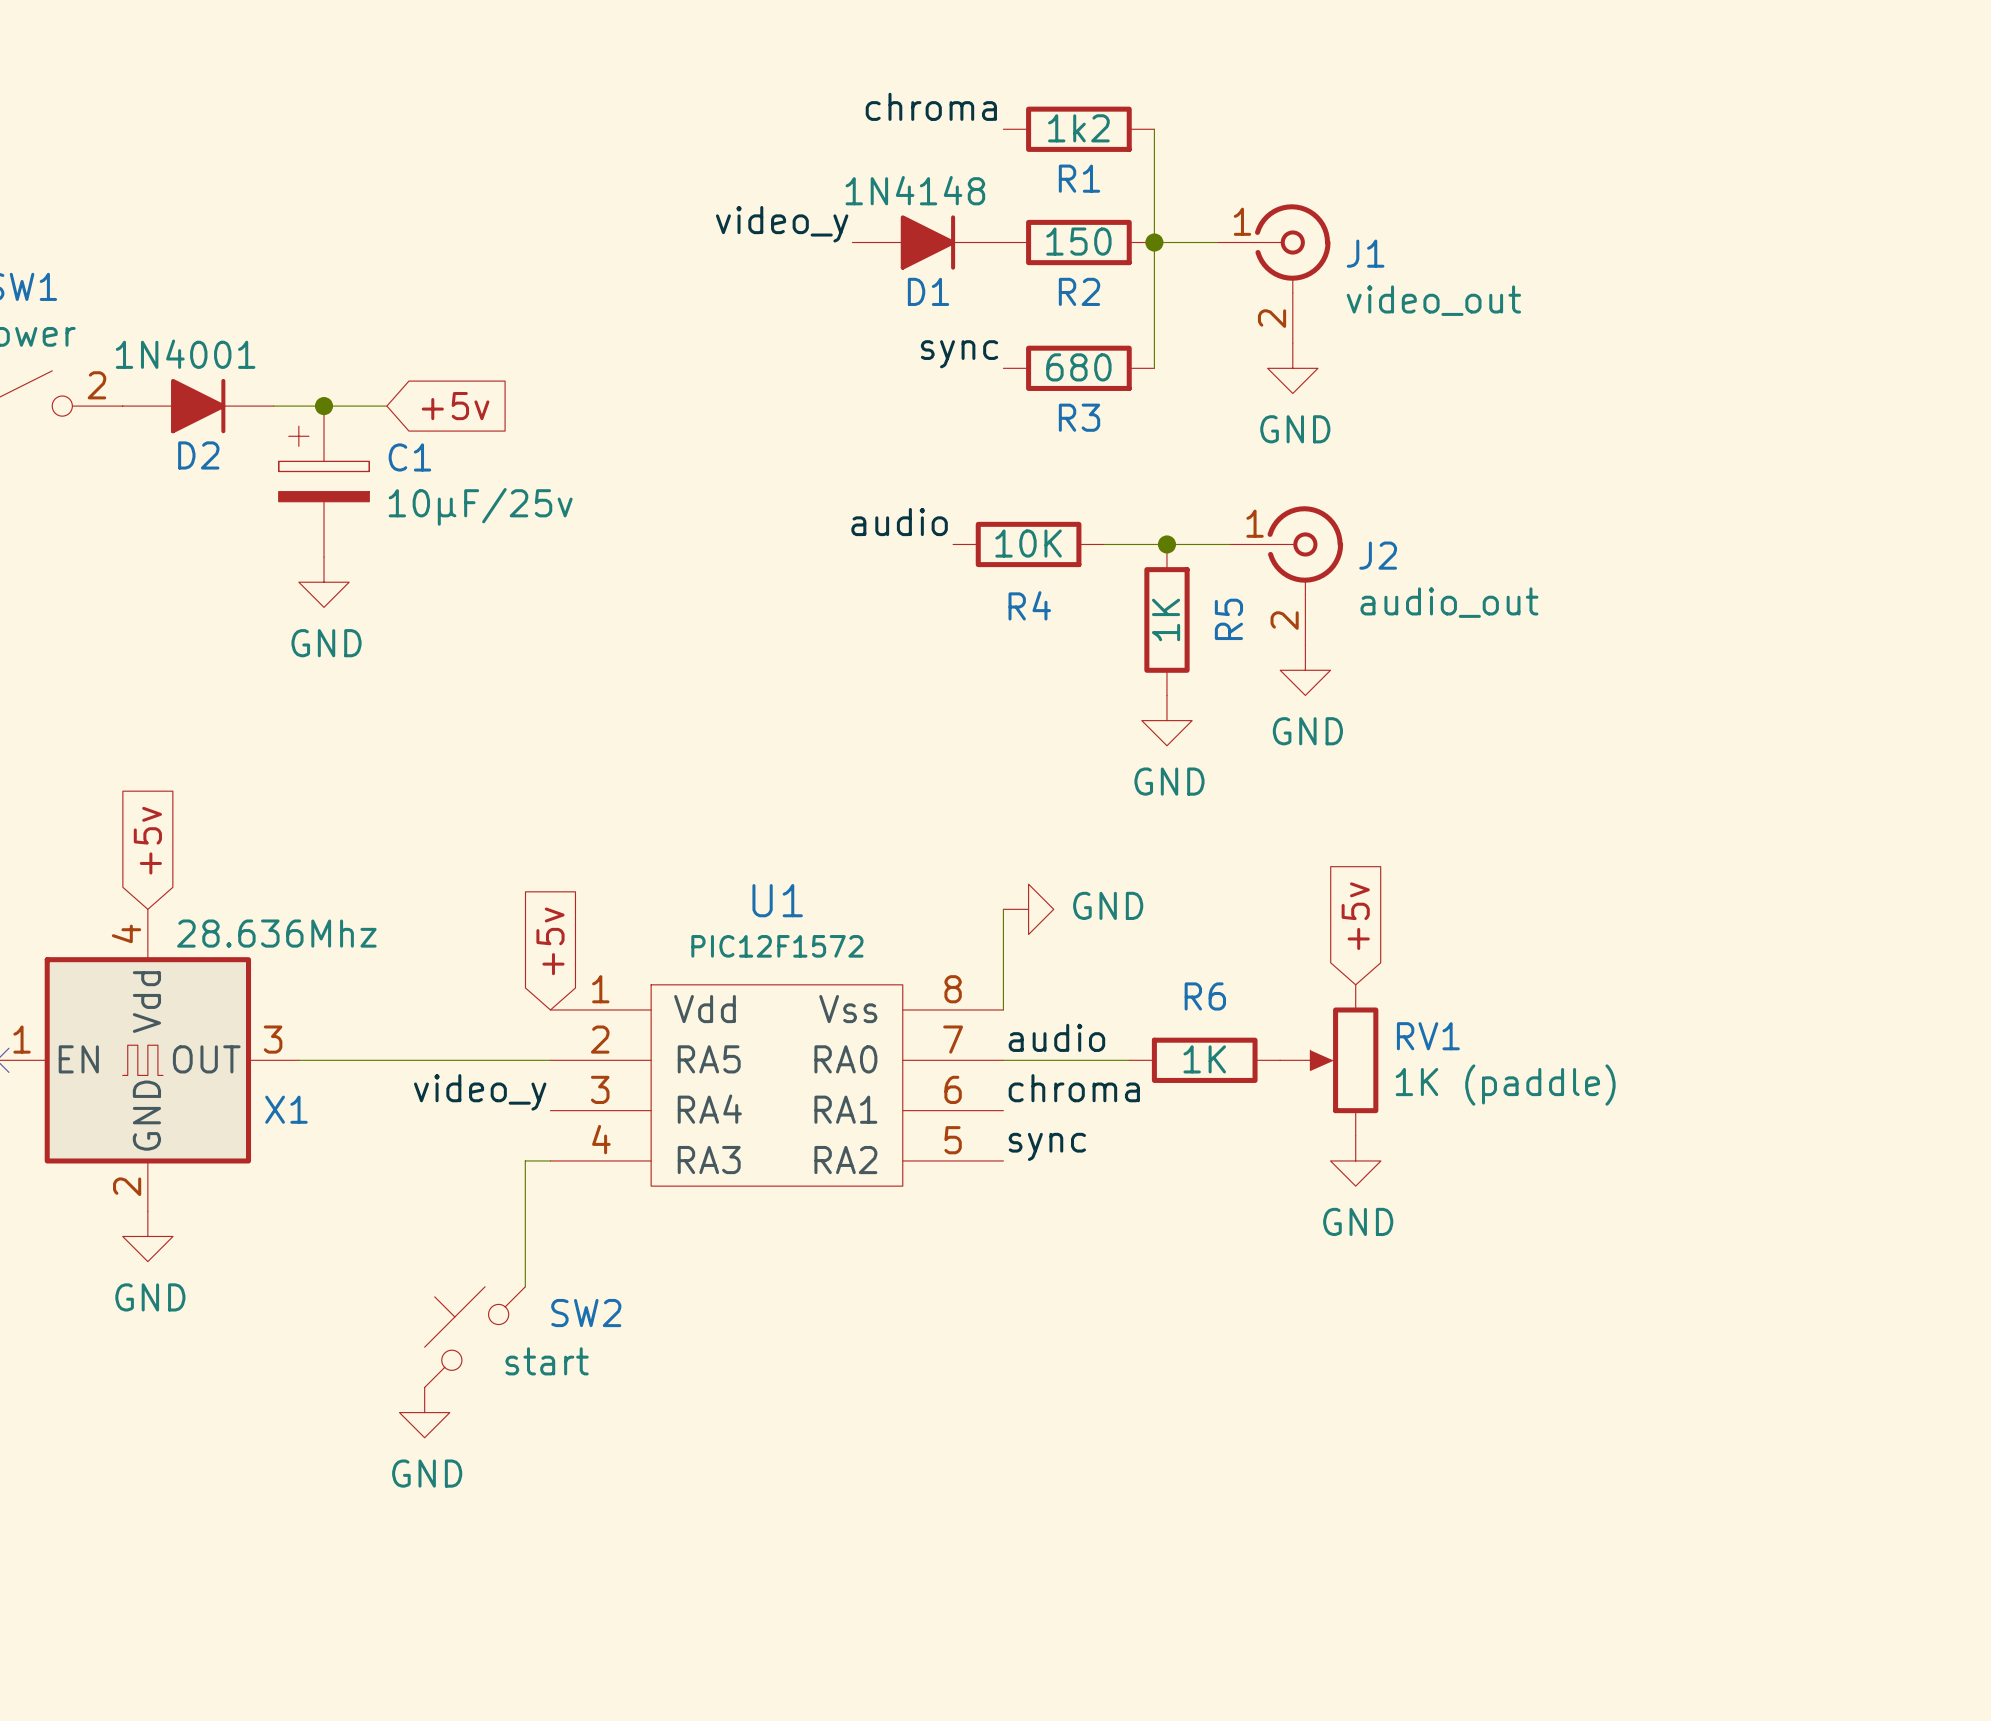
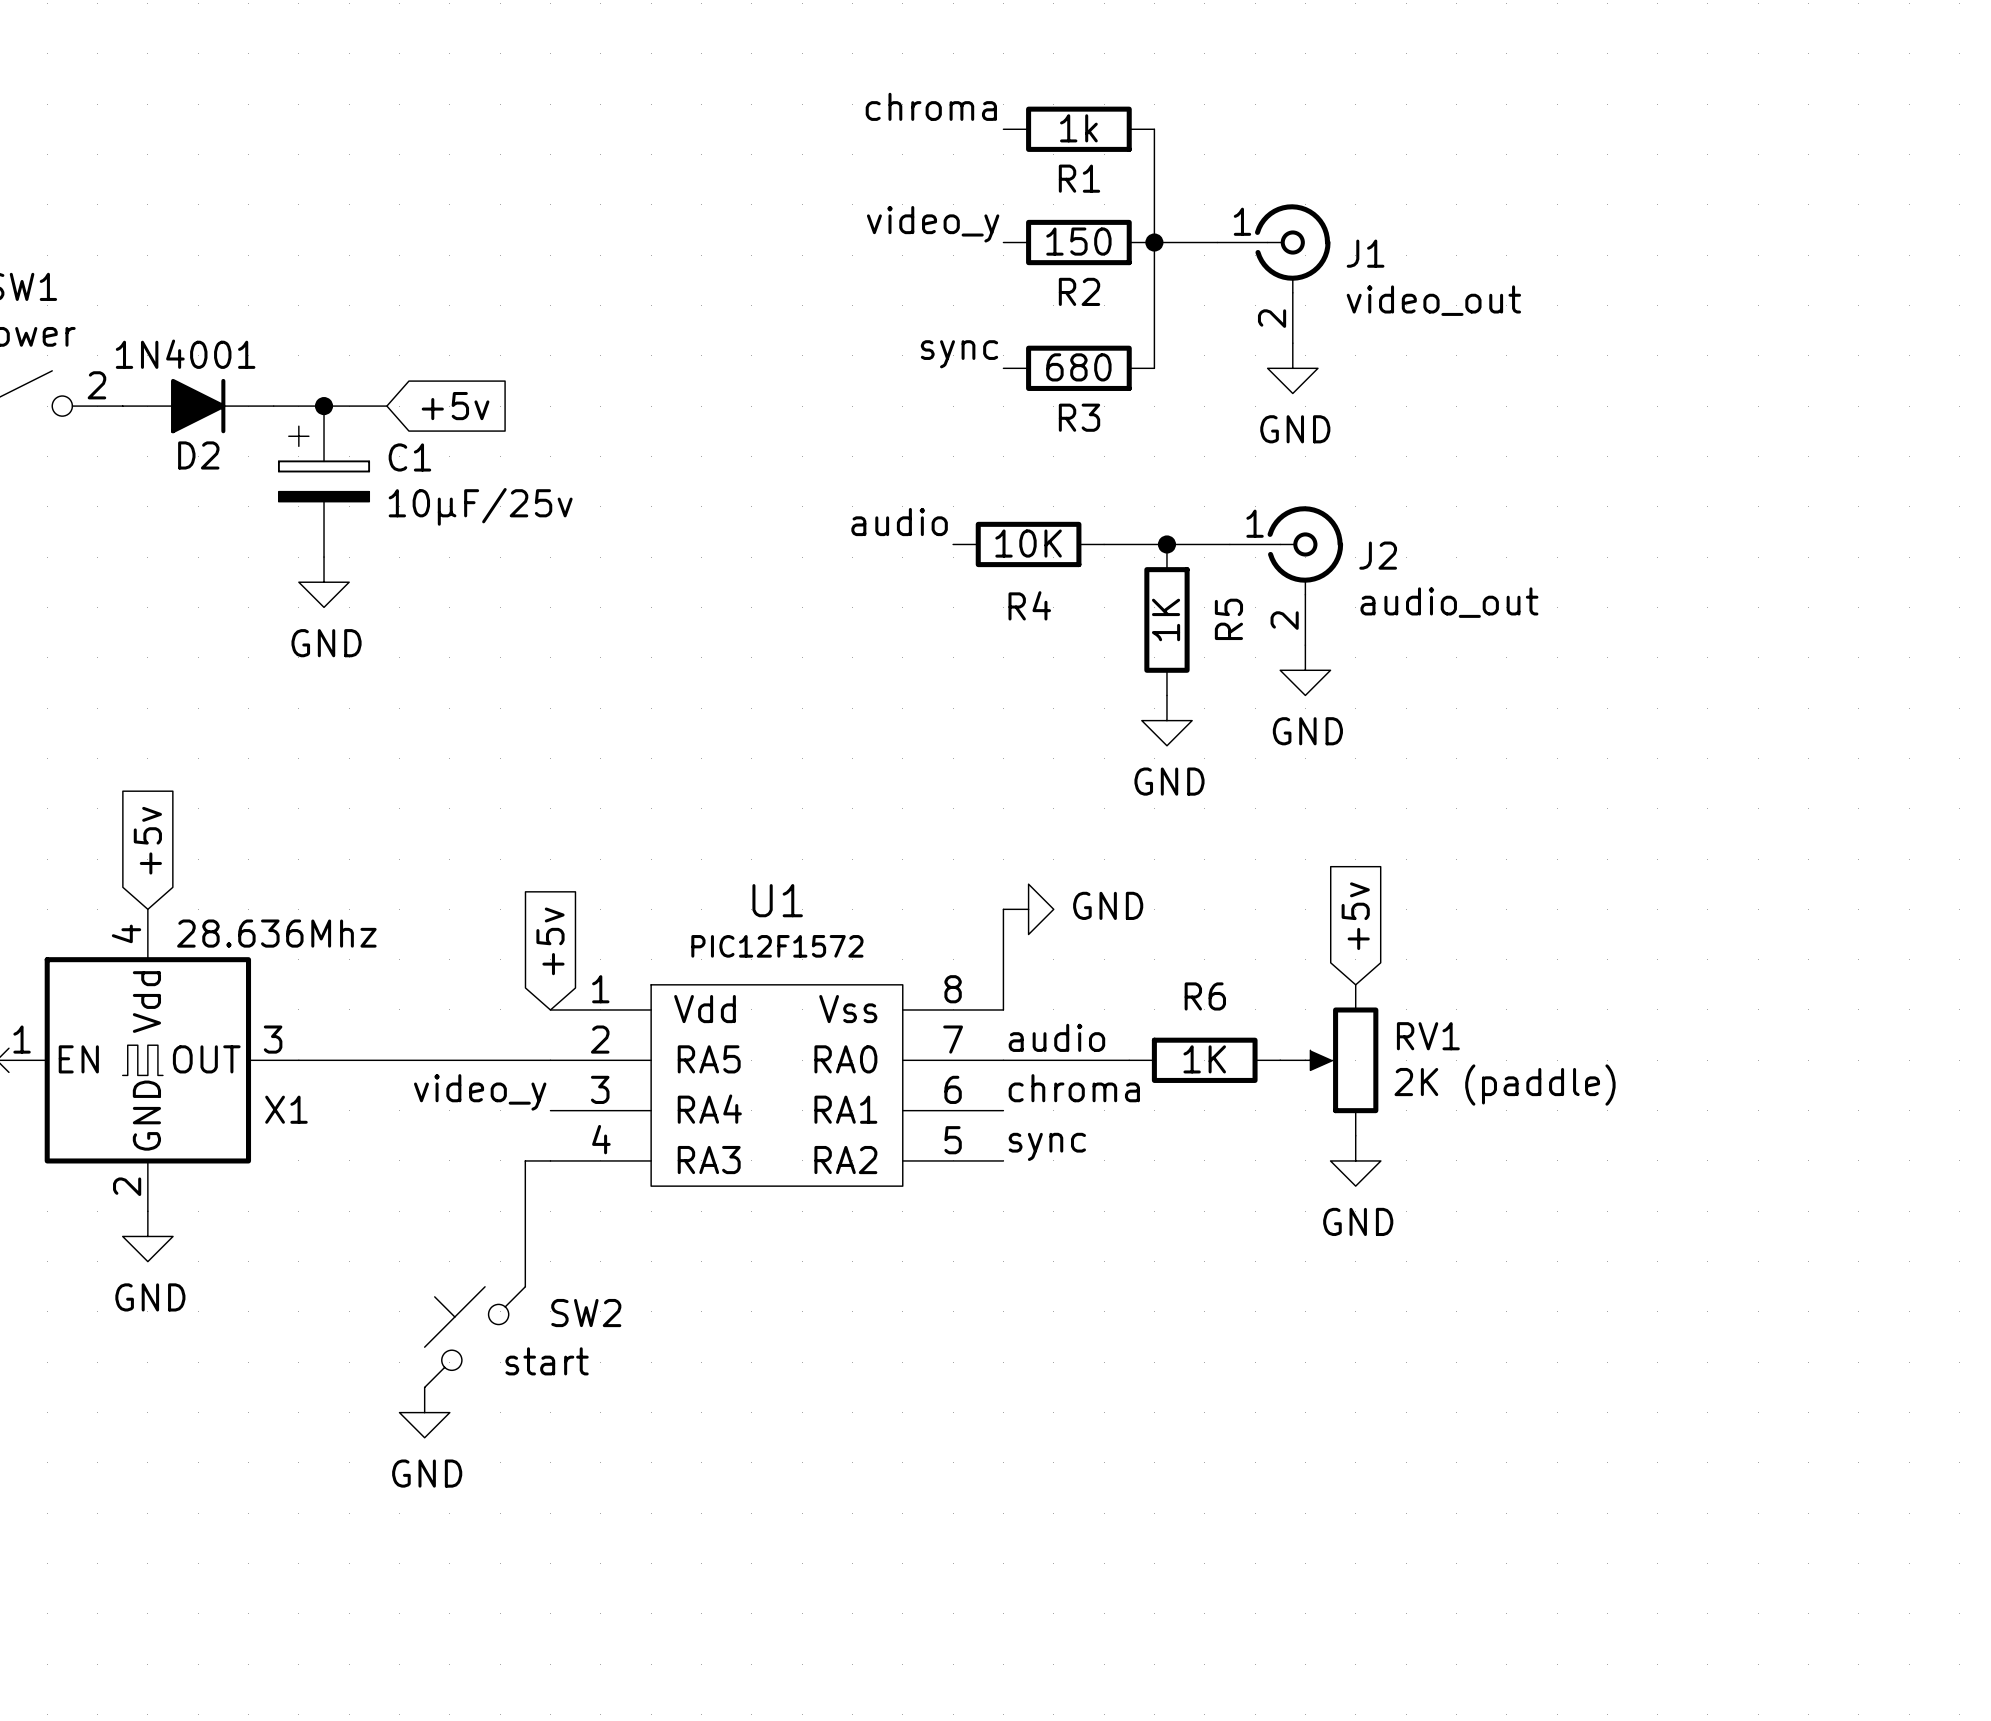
R1 value: 1k2 (1078, 128) -> 1k (1078, 128)
label position: video_y (782, 224) -> video_y (933, 224)
D1: 1N4148 (927, 242) -> none
RV1 value: 1K (paddle) (1505, 1085) -> 2K (paddle) (1505, 1085)

